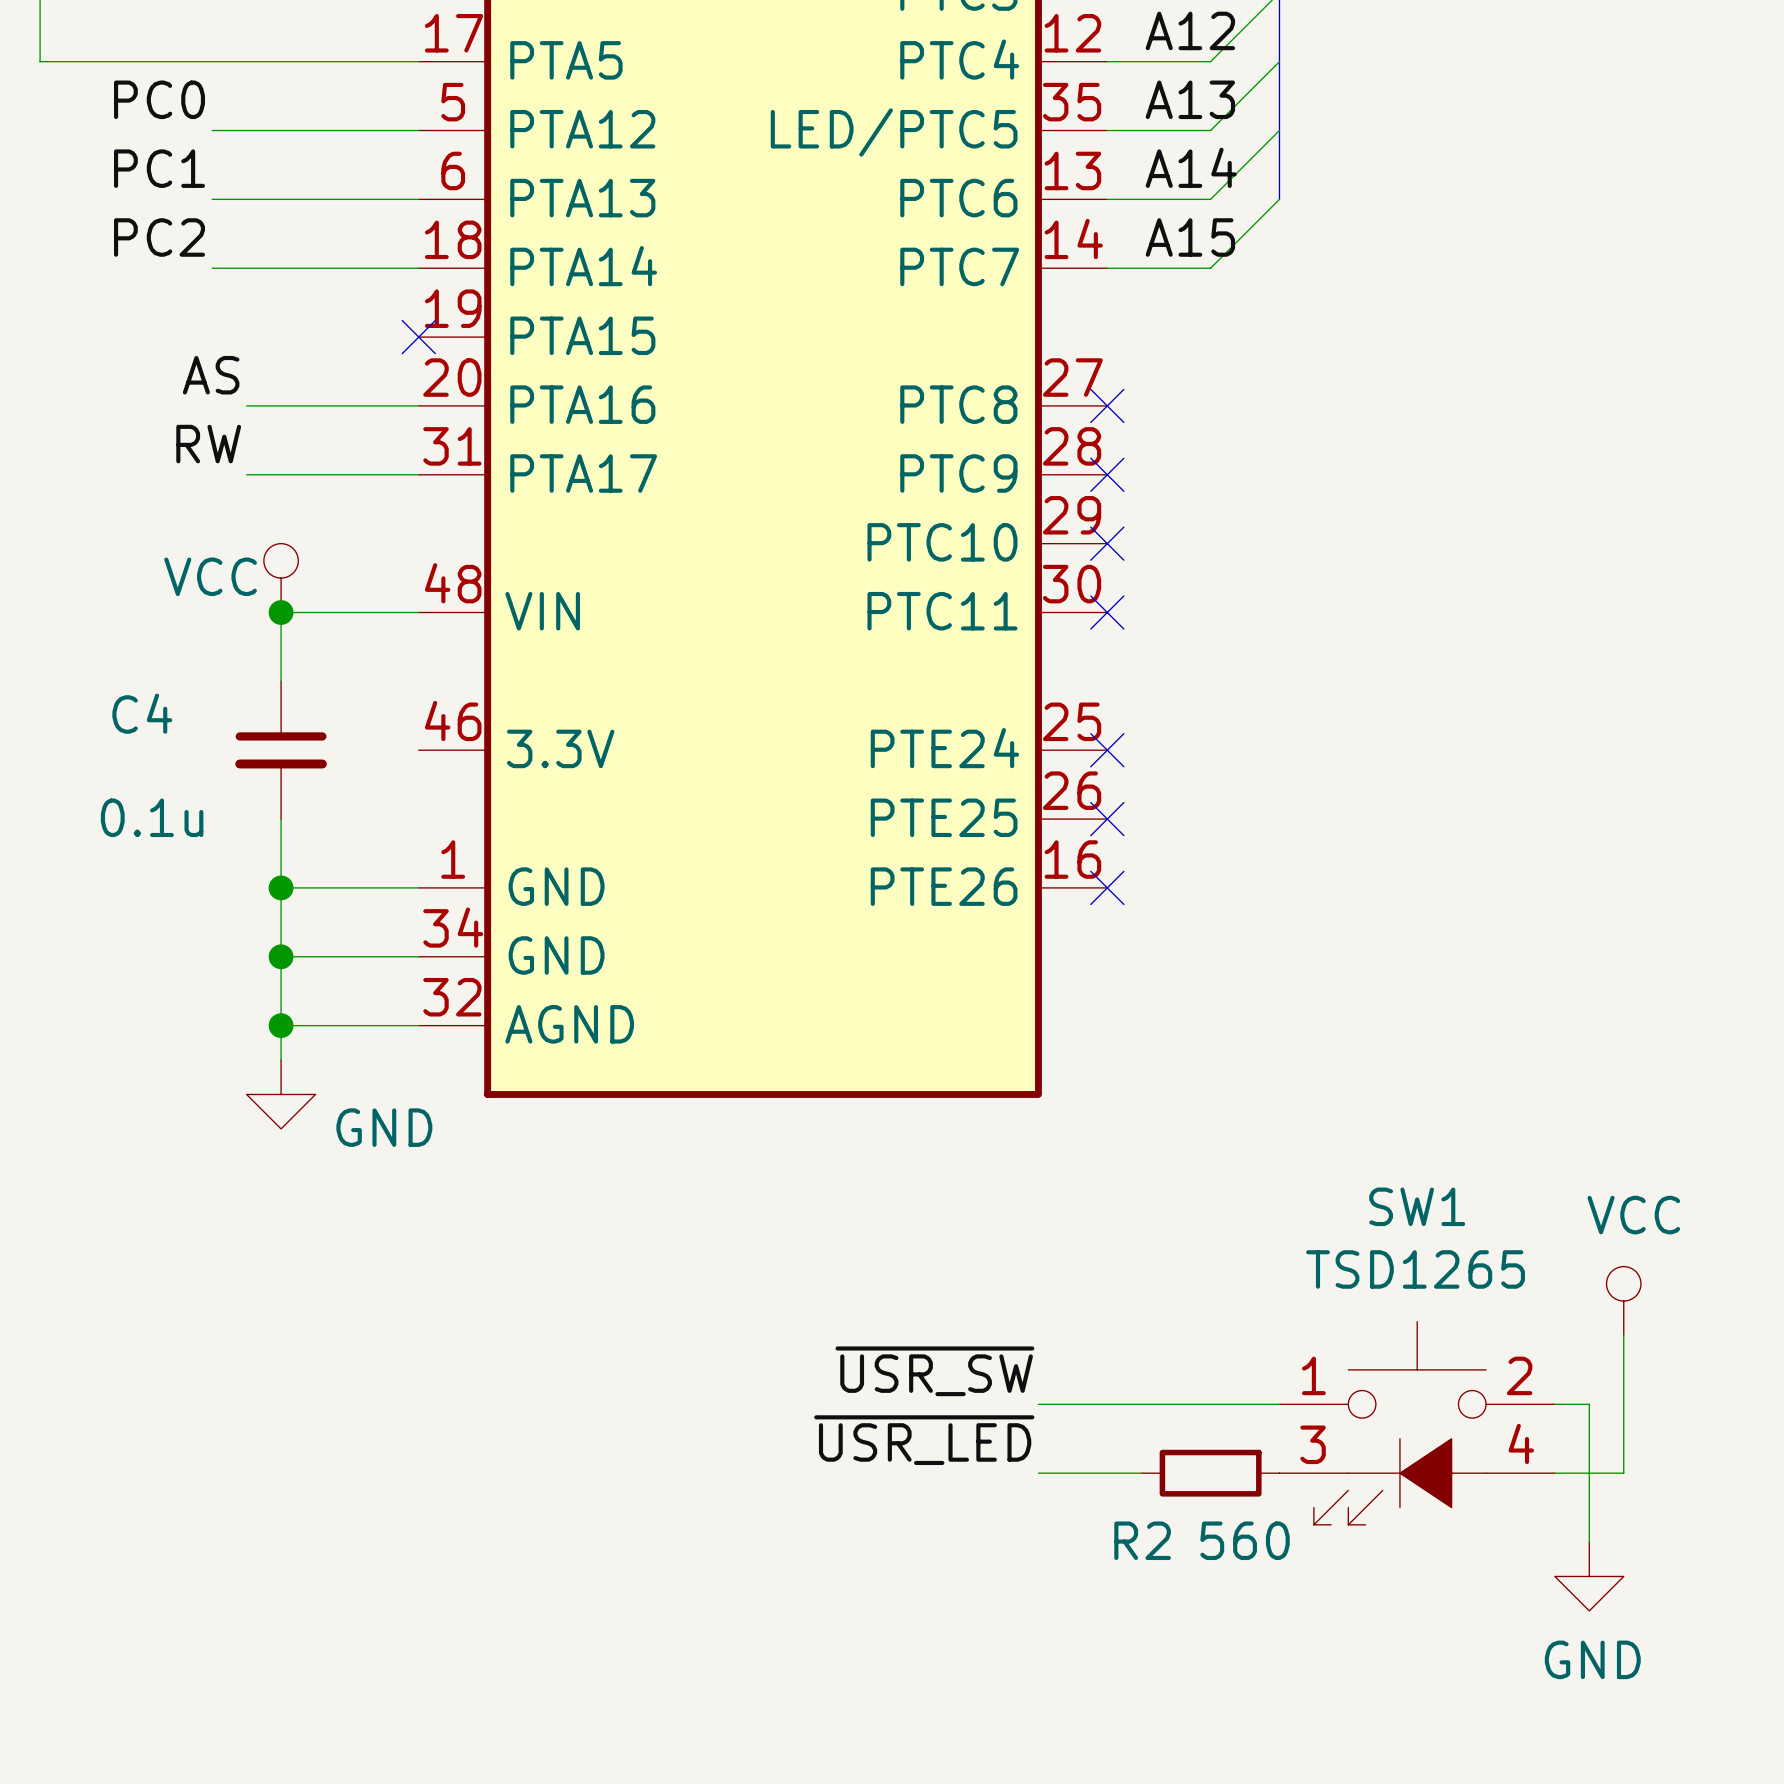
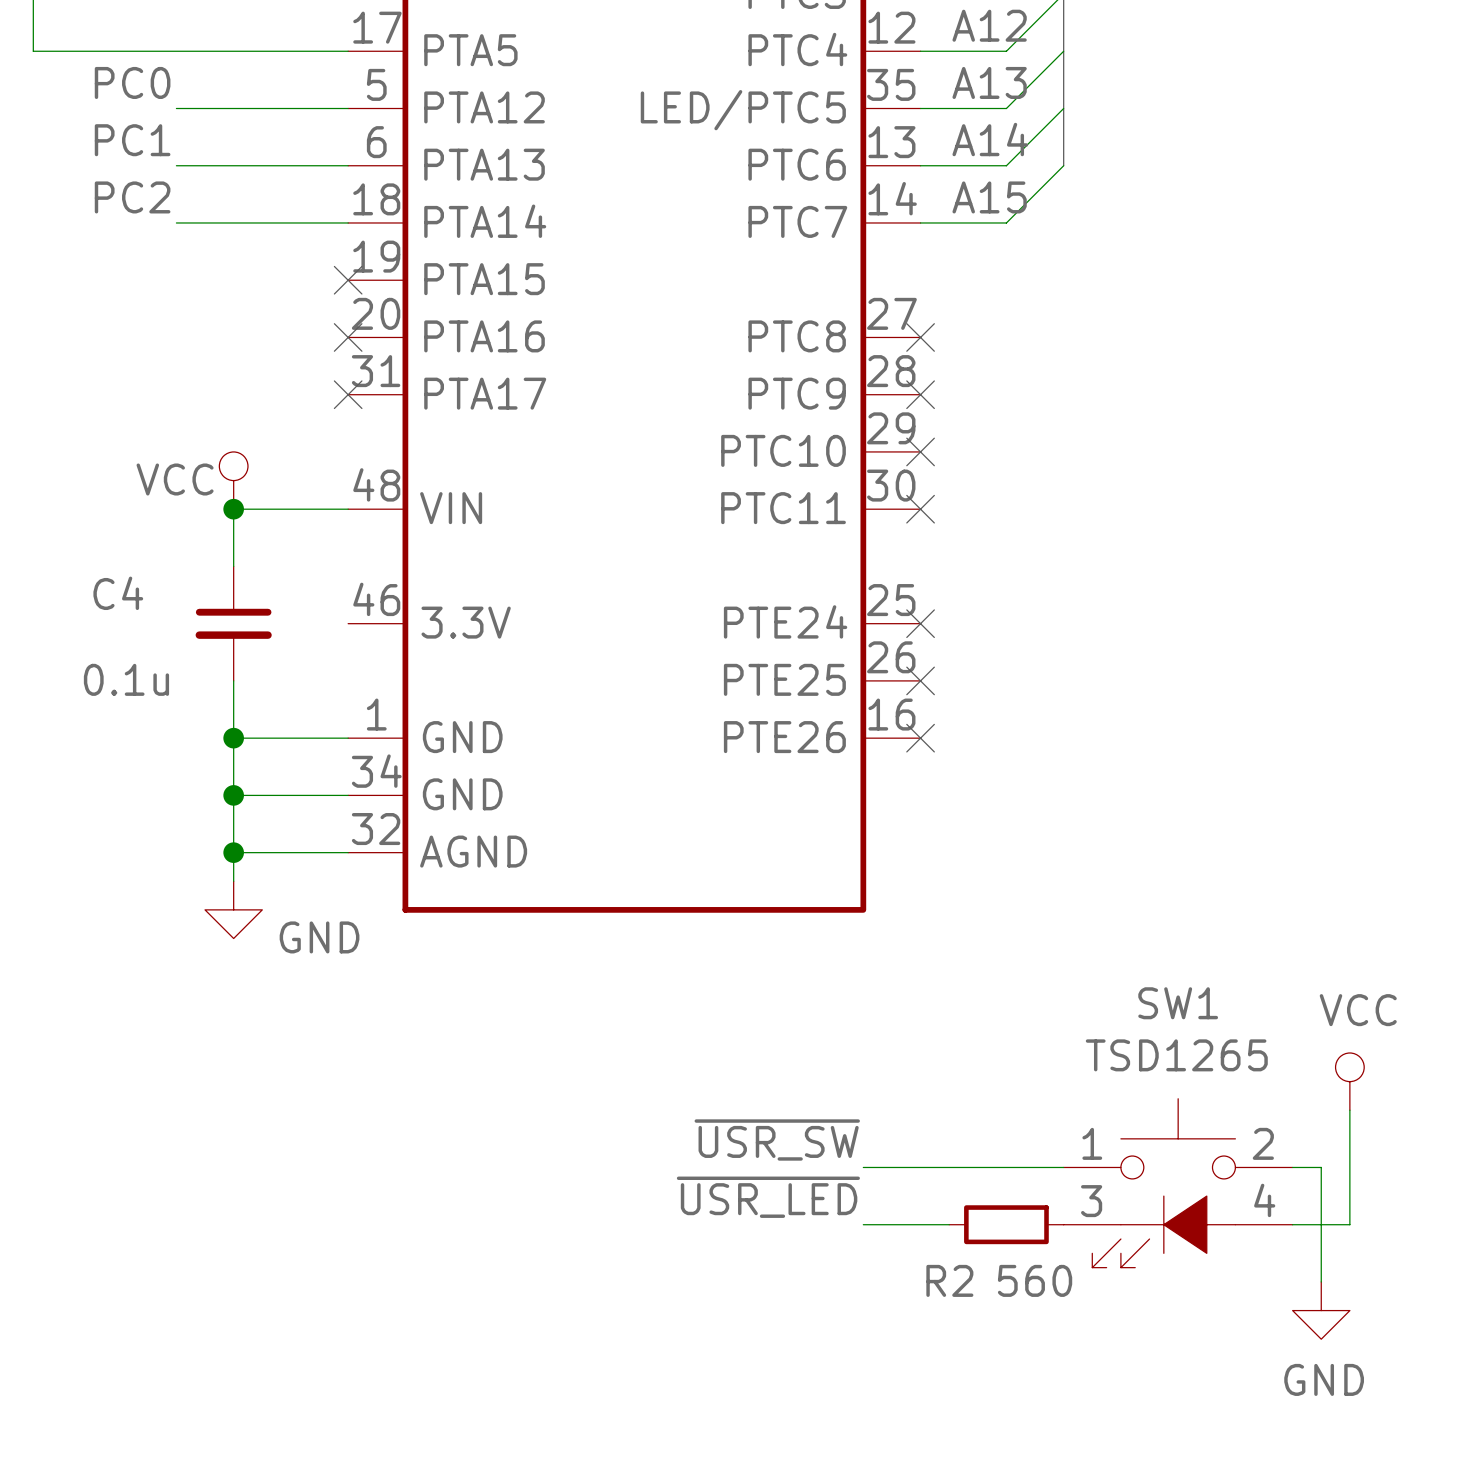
label: AS (211, 375) -> none
wire: (246, 405) (418, 405) -> none
no-connect mark: none -> (348, 337)
label: RW (208, 444) -> none
wire: (246, 474) (418, 474) -> none
no-connect mark: none -> (348, 394)

